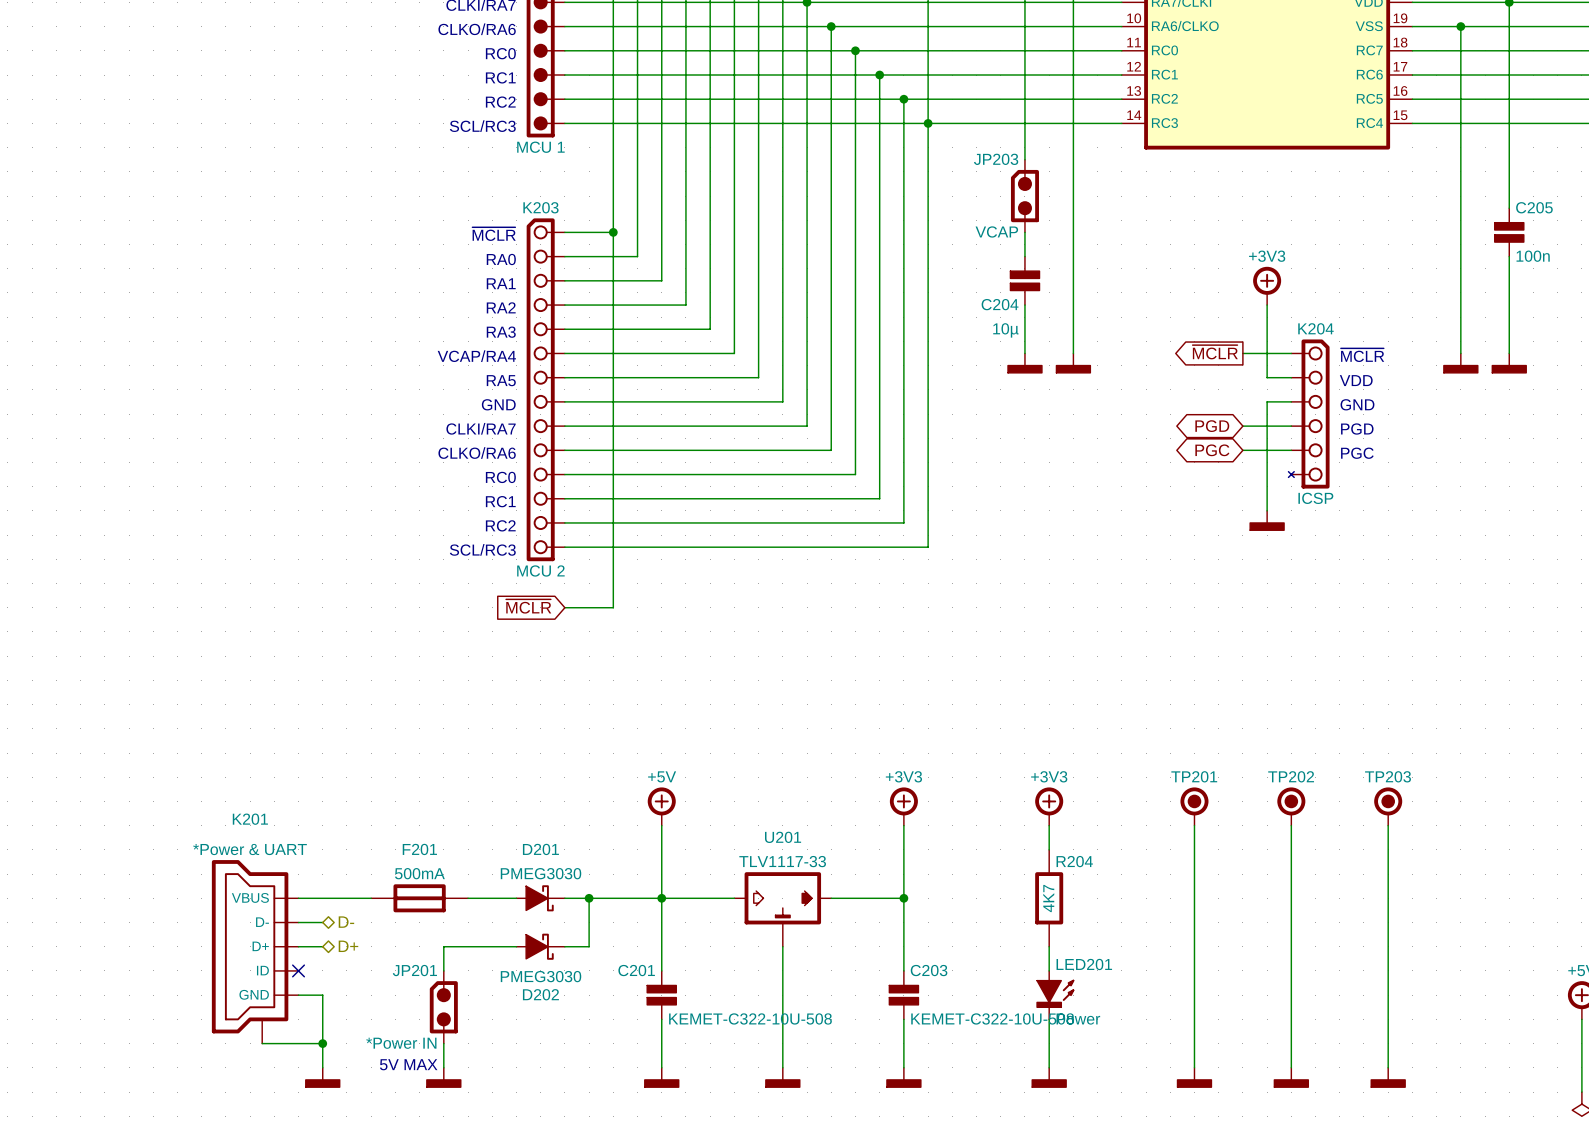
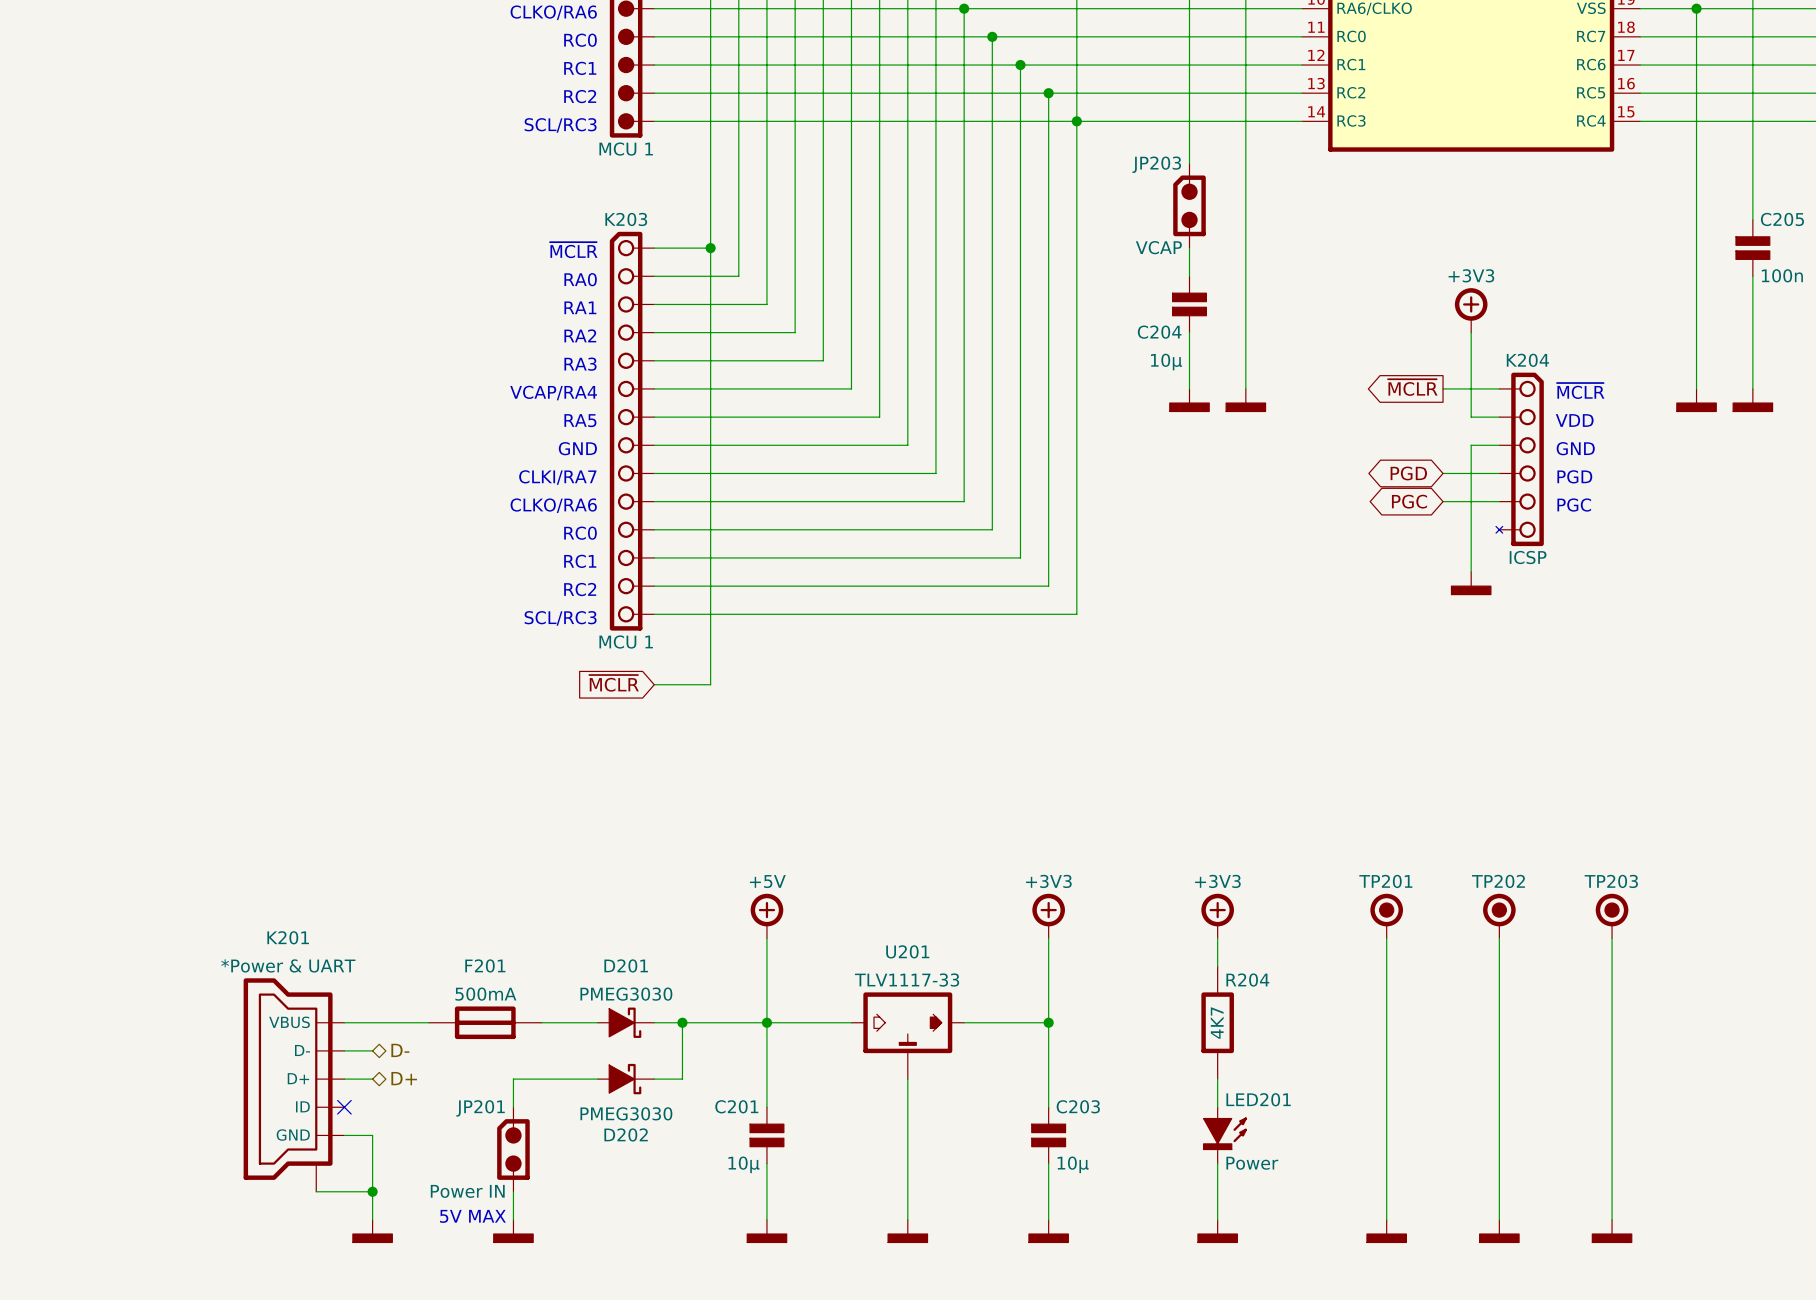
K203 value: MCU 2 (540, 570) -> MCU 1 (626, 642)
K201 symbol: [211, 860, 299, 1044] -> [243, 978, 345, 1192]
C201 value: KEMET-C322-10U-508 (750, 1018) -> 10µ (743, 1164)
C203 value: KEMET-C322-10U-508 (992, 1018) -> 10µ (1073, 1164)
wire: (262, 1043) (274, 1043) -> none
JP201 value: *Power IN (401, 1043) -> Power IN (467, 1191)

